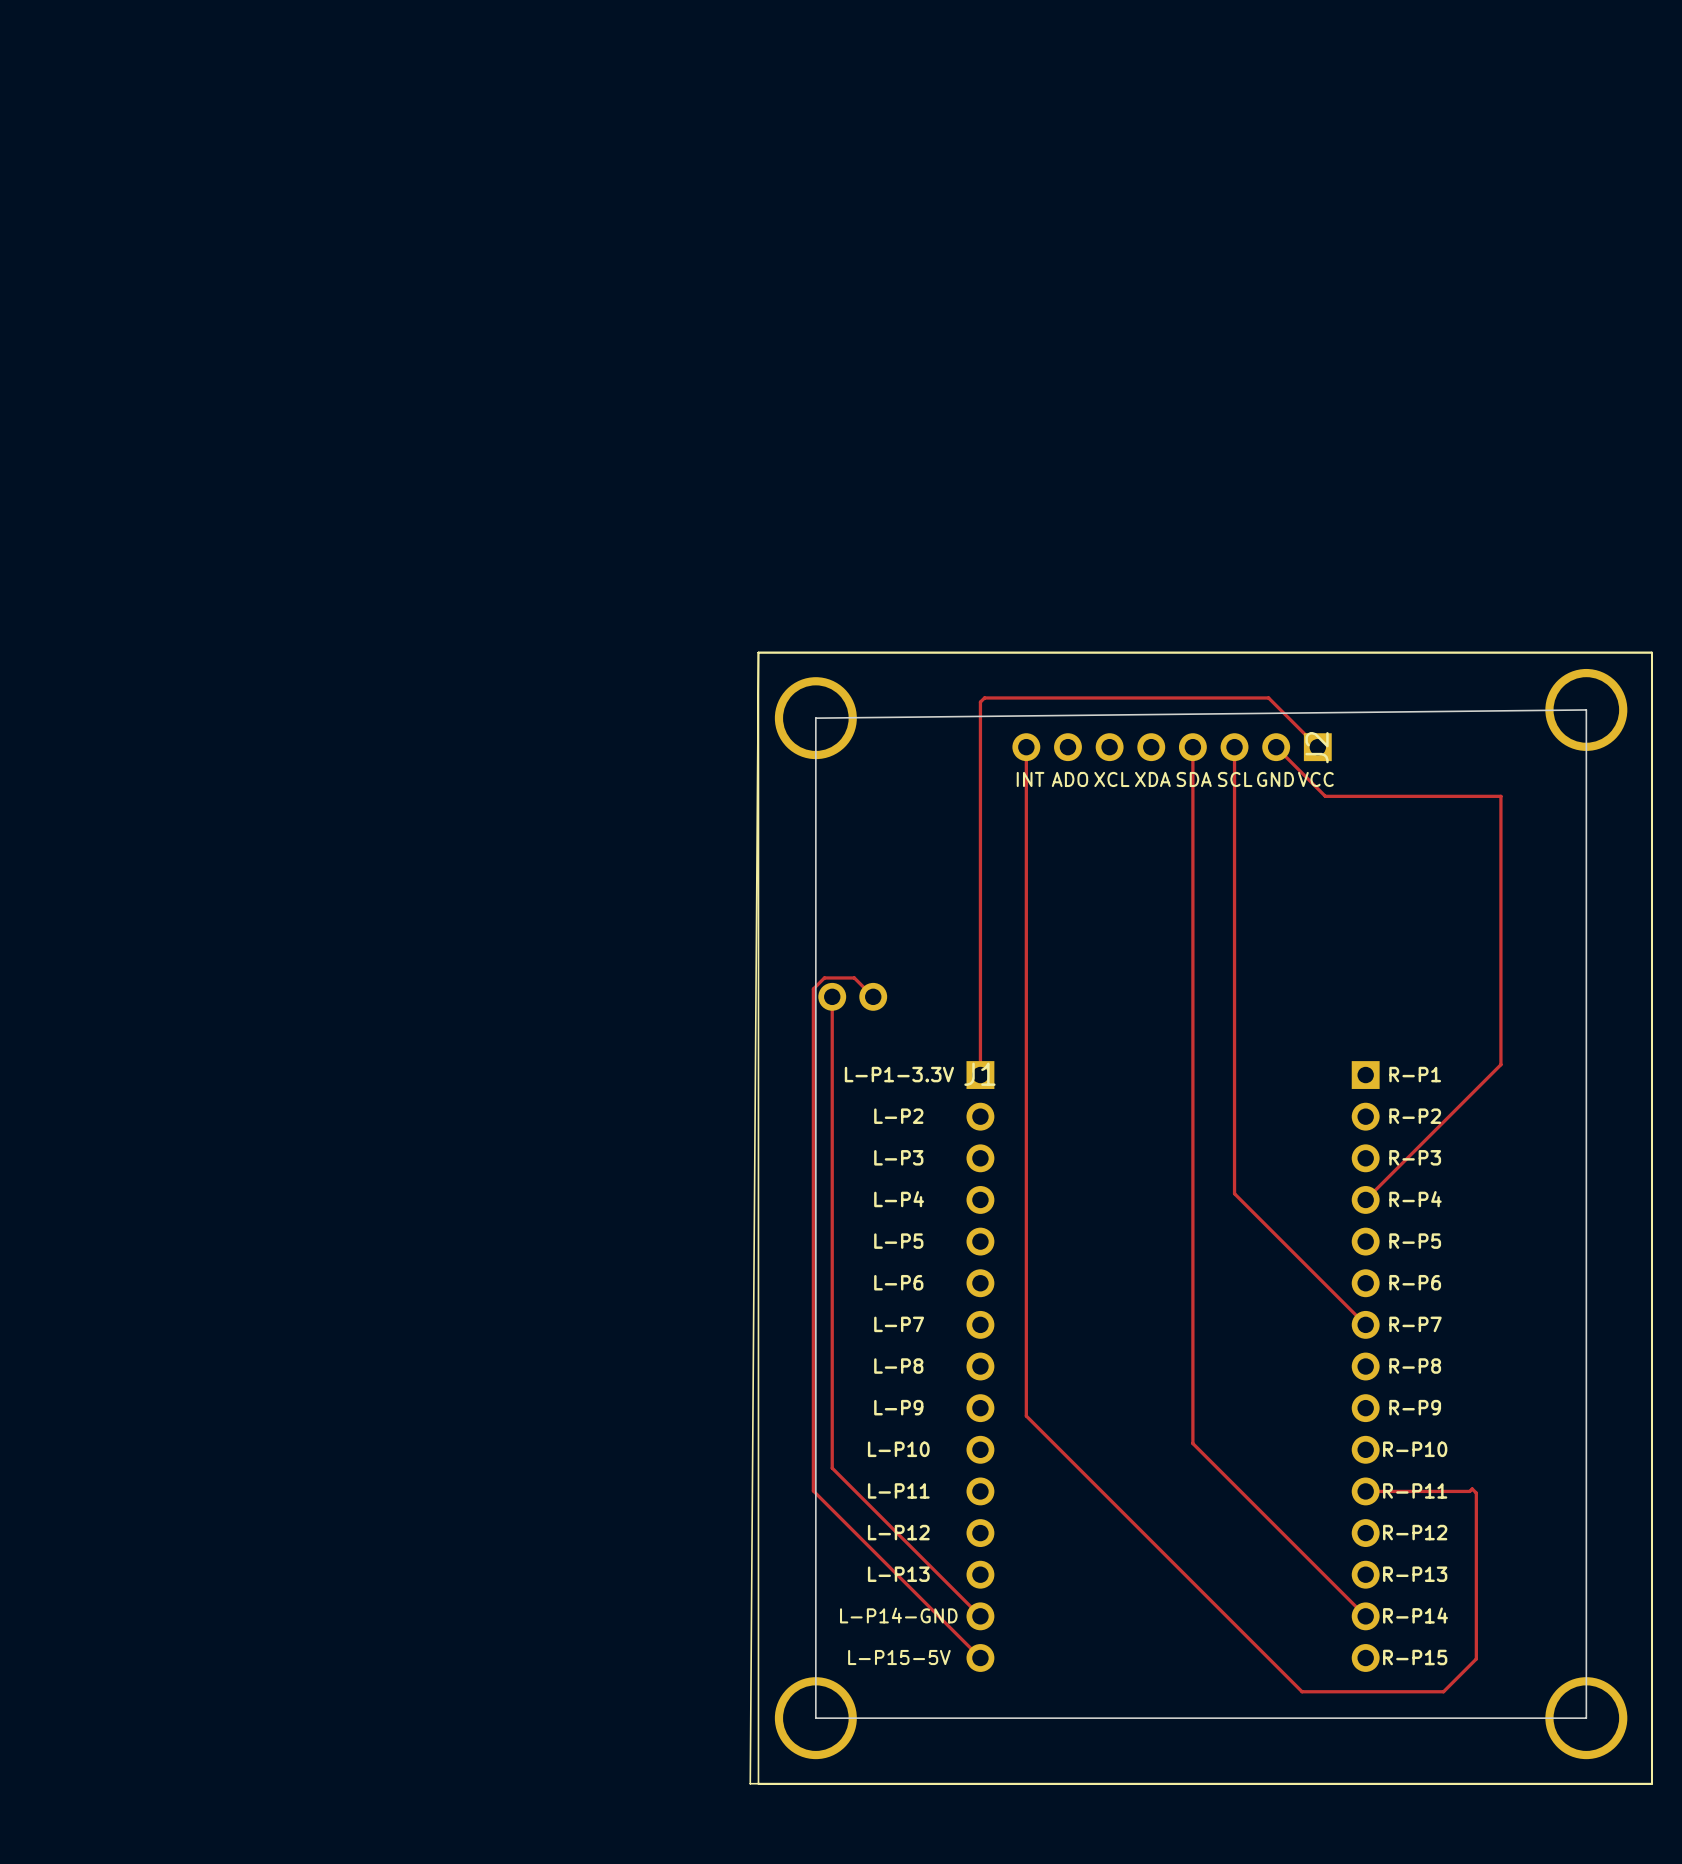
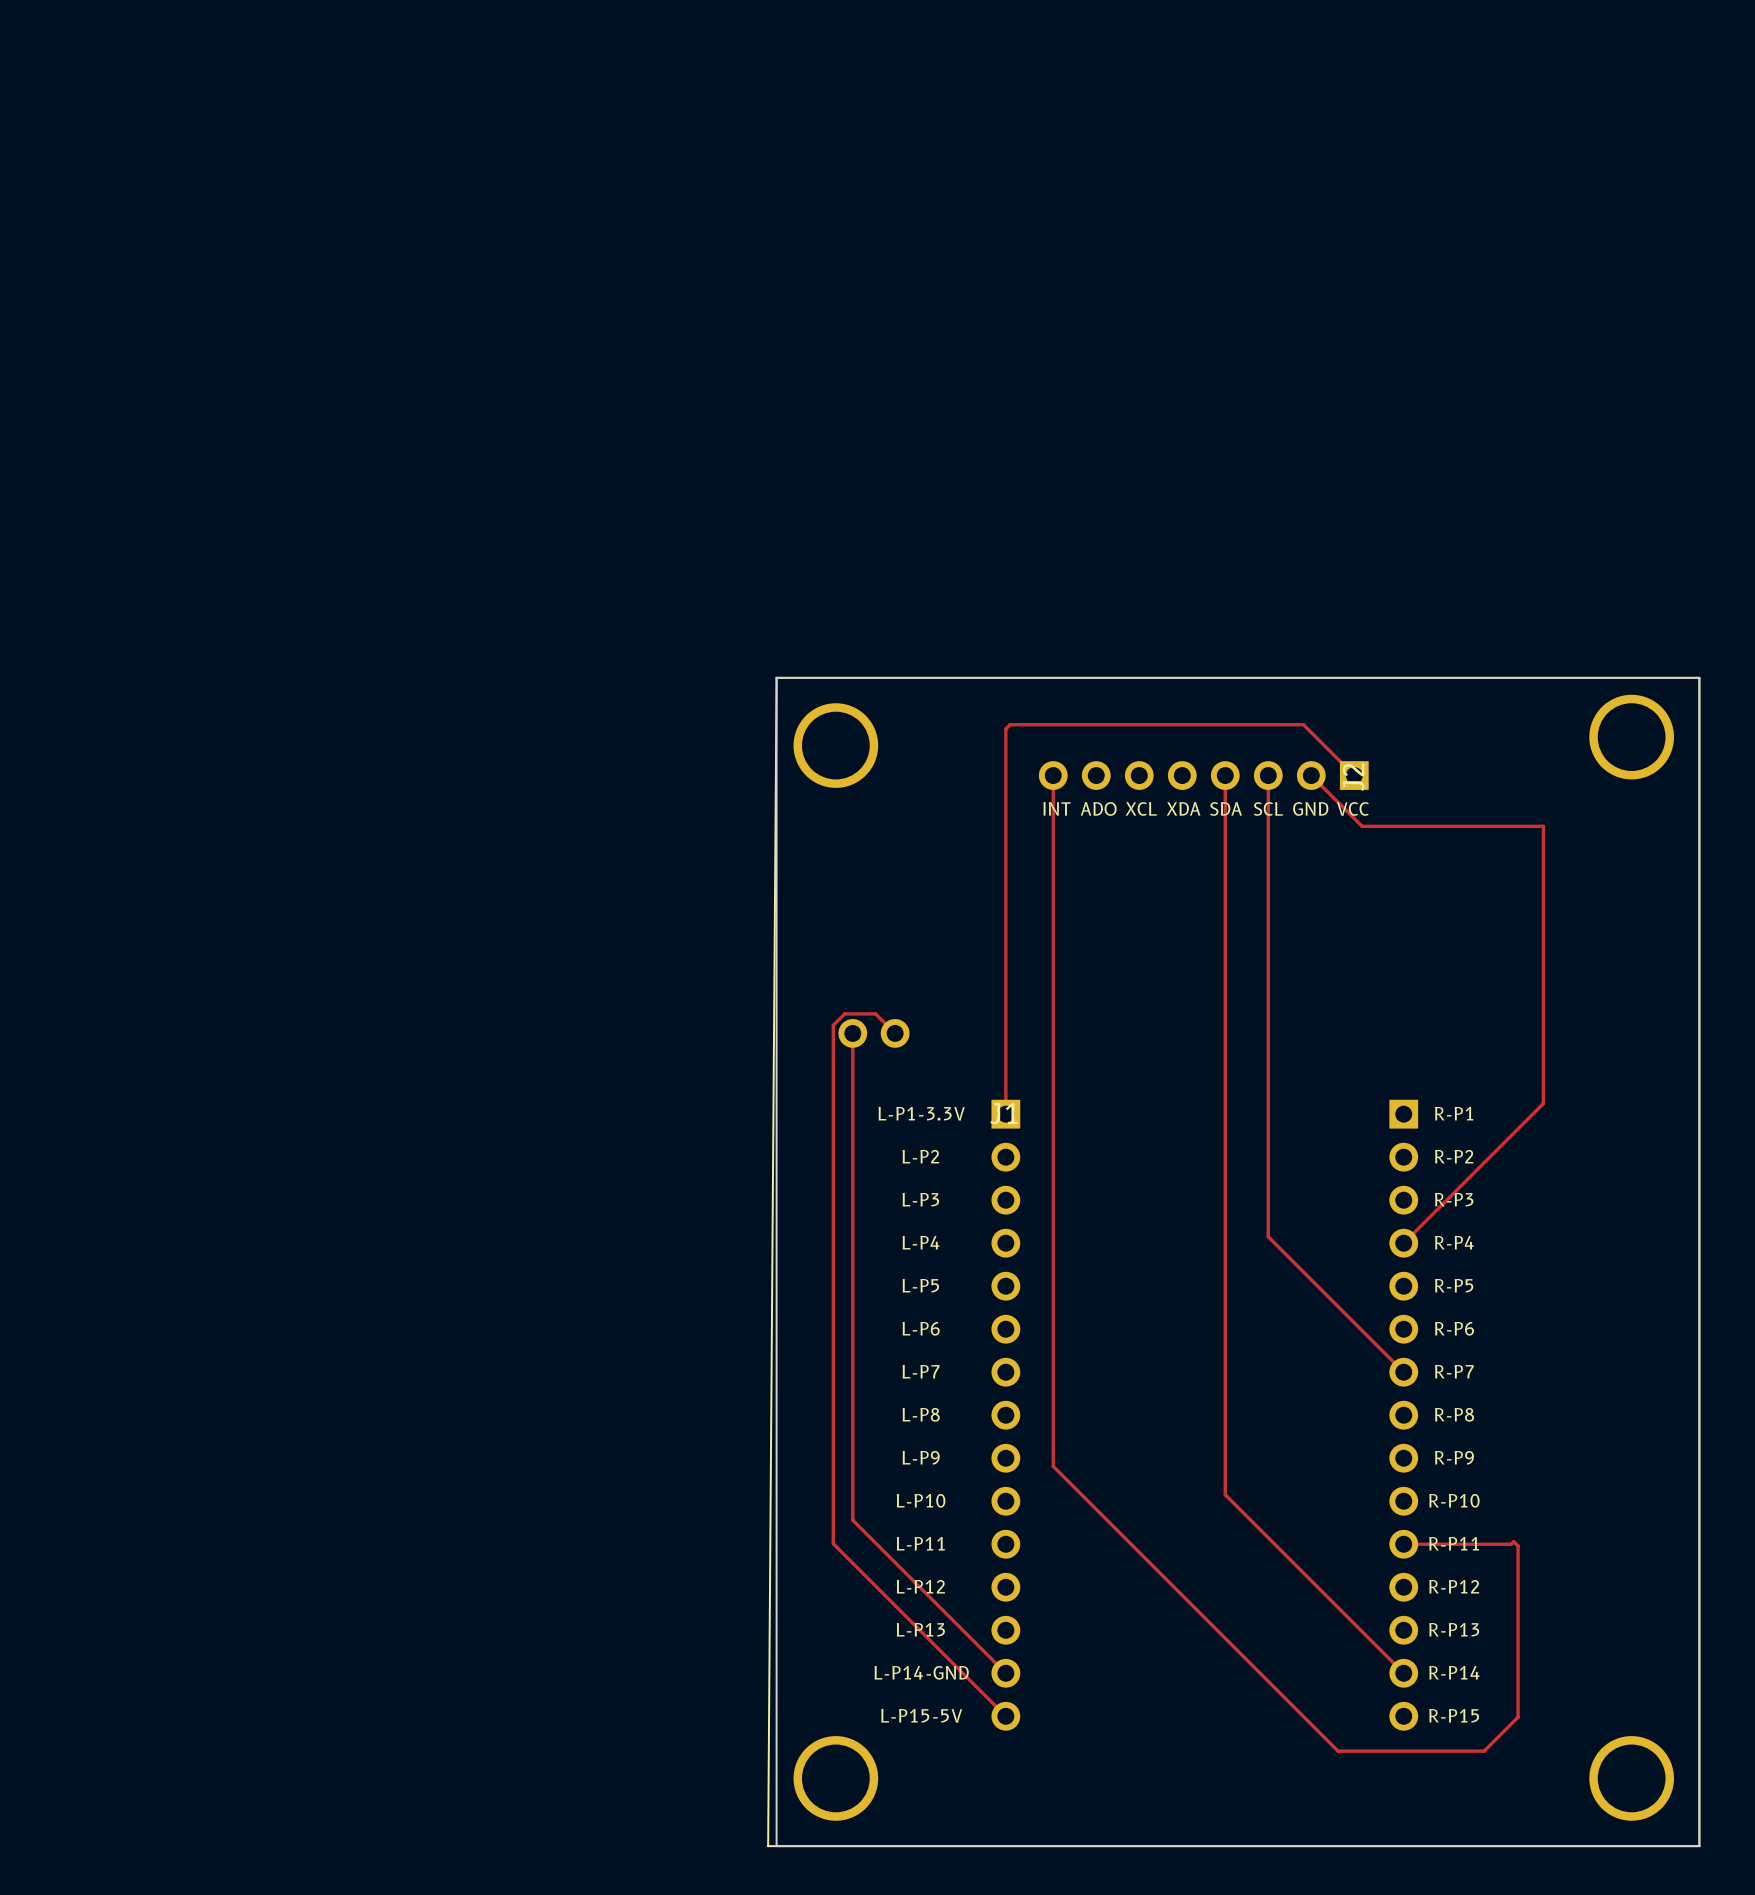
line: (758, 652) (758, 1783) -> none
board edge: (1586, 709) (815, 718) (815, 1718) (1586, 1718) (1586, 709) -> (776, 677) (776, 1846) (1699, 1846) (1699, 677) (776, 677)

